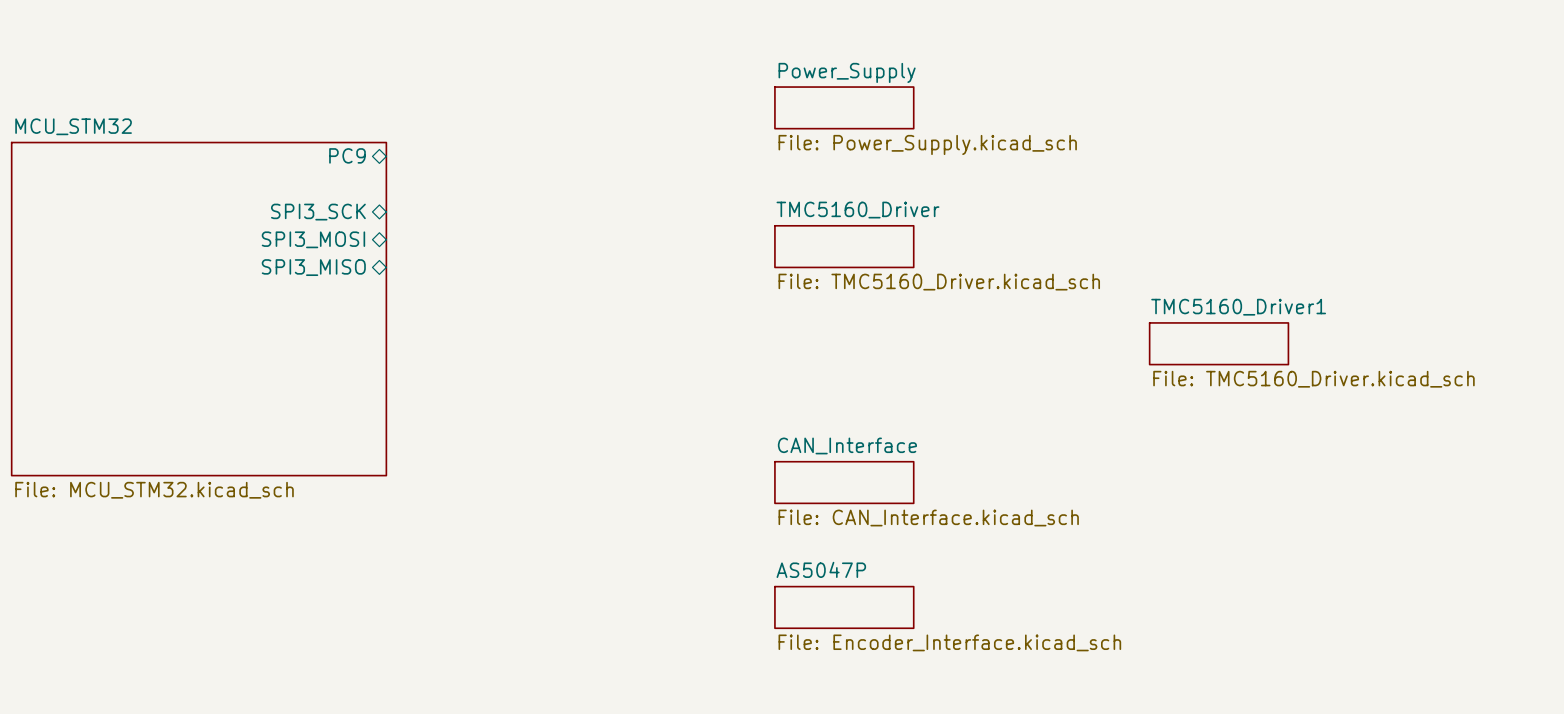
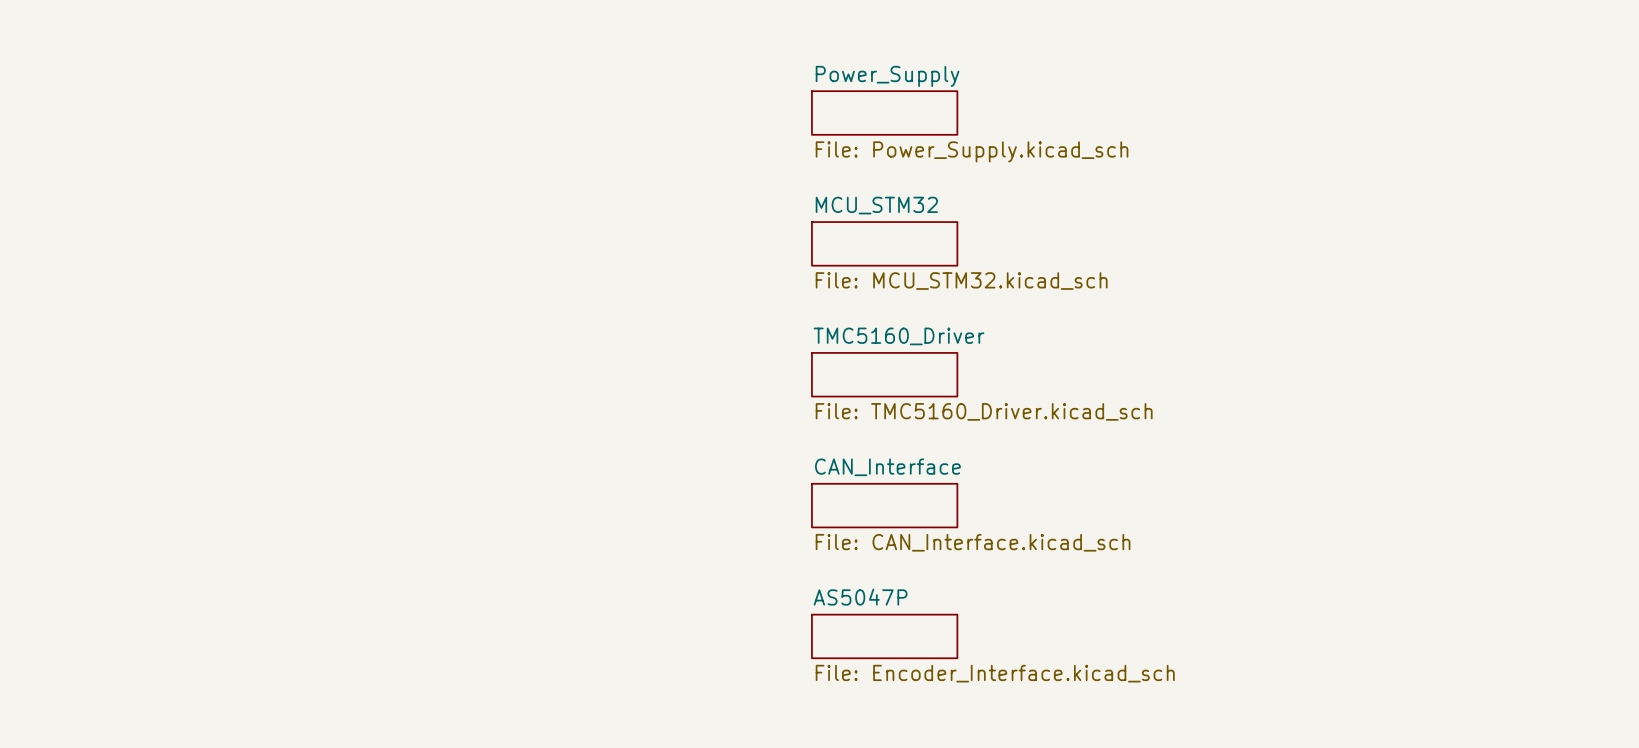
sheet MCU_STM32 name position: MCU_STM32 (73, 126) -> MCU_STM32 (876, 205)
sheet MCU_STM32 shape: [10, 141, 388, 477] -> [811, 221, 959, 267]
sheet pin: PC9 (347, 155) -> none
sheet pin: SPI3_SCK (318, 212) -> none
sheet pin: SPI3_MOSI (313, 239) -> none
sheet TMC5160_Driver position: (844, 246) -> (884, 374)
sheet pin: SPI3_MISO (313, 267) -> none
sheet TMC5160_Driver1: File: TMC5160_Driver.kicad_sch (1219, 343) -> none
sheet MCU_STM32 value position: File: MCU_STM32.kicad_sch (154, 490) -> File: MCU_STM32.kicad_sch (961, 281)

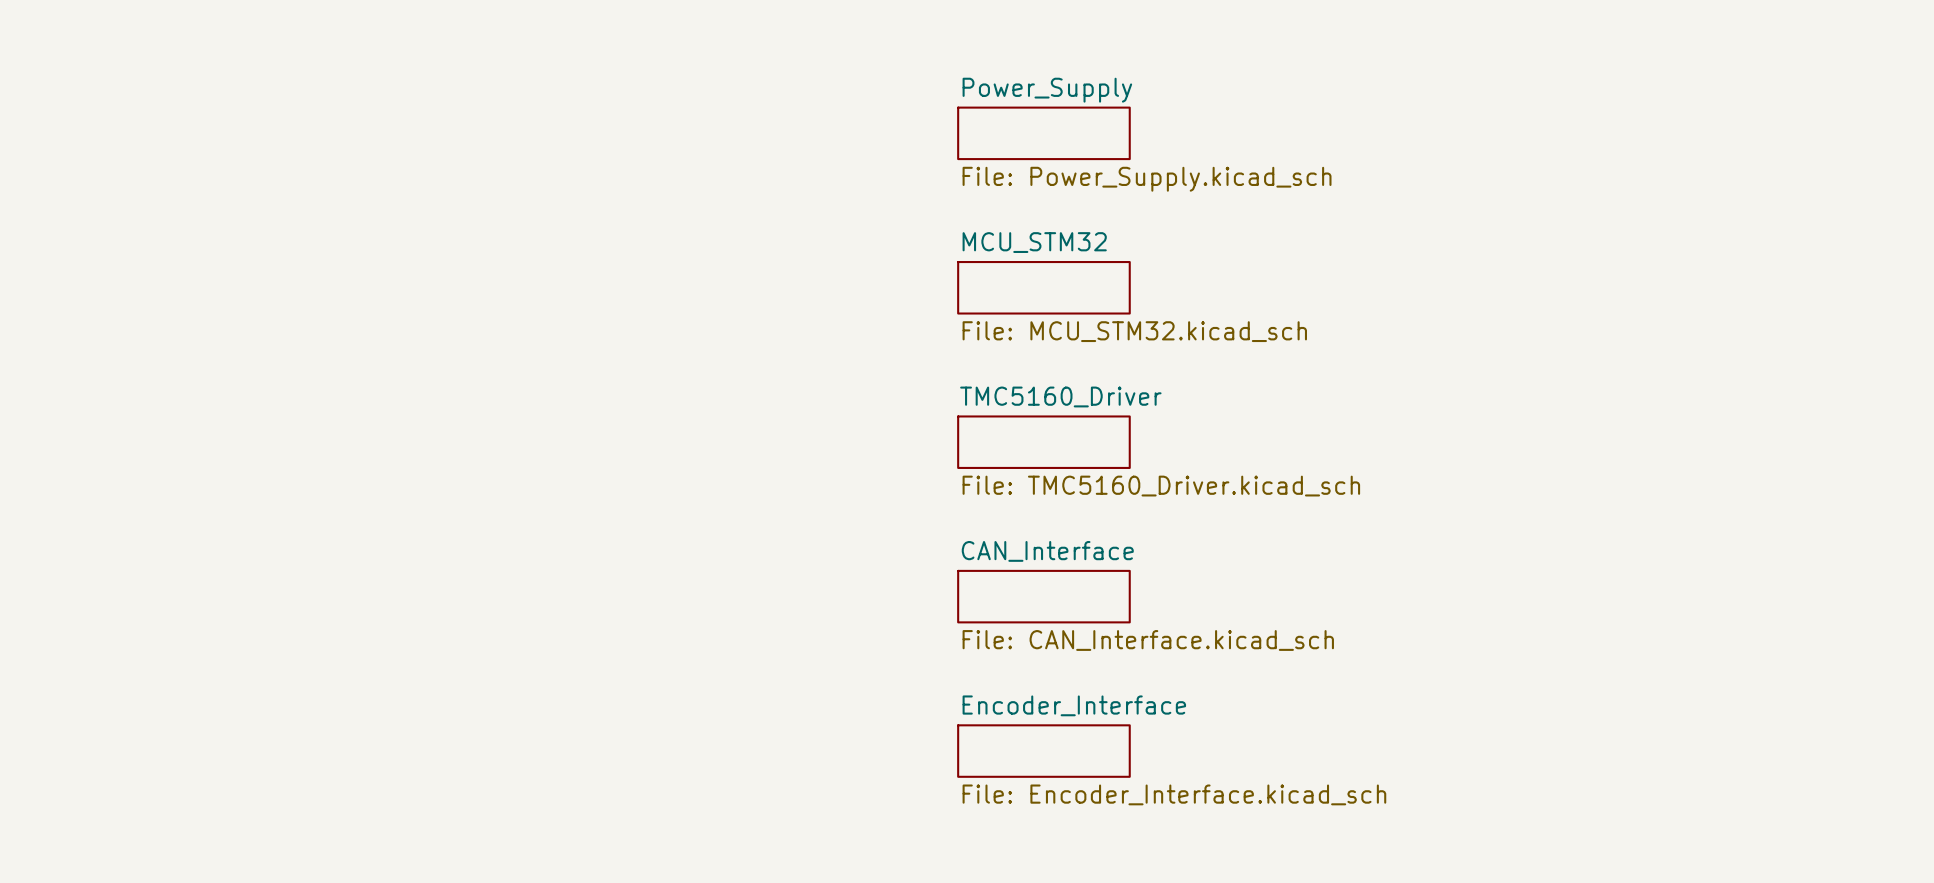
sheet AS5047P name: AS5047P (860, 597) -> Encoder_Interface (1074, 705)

